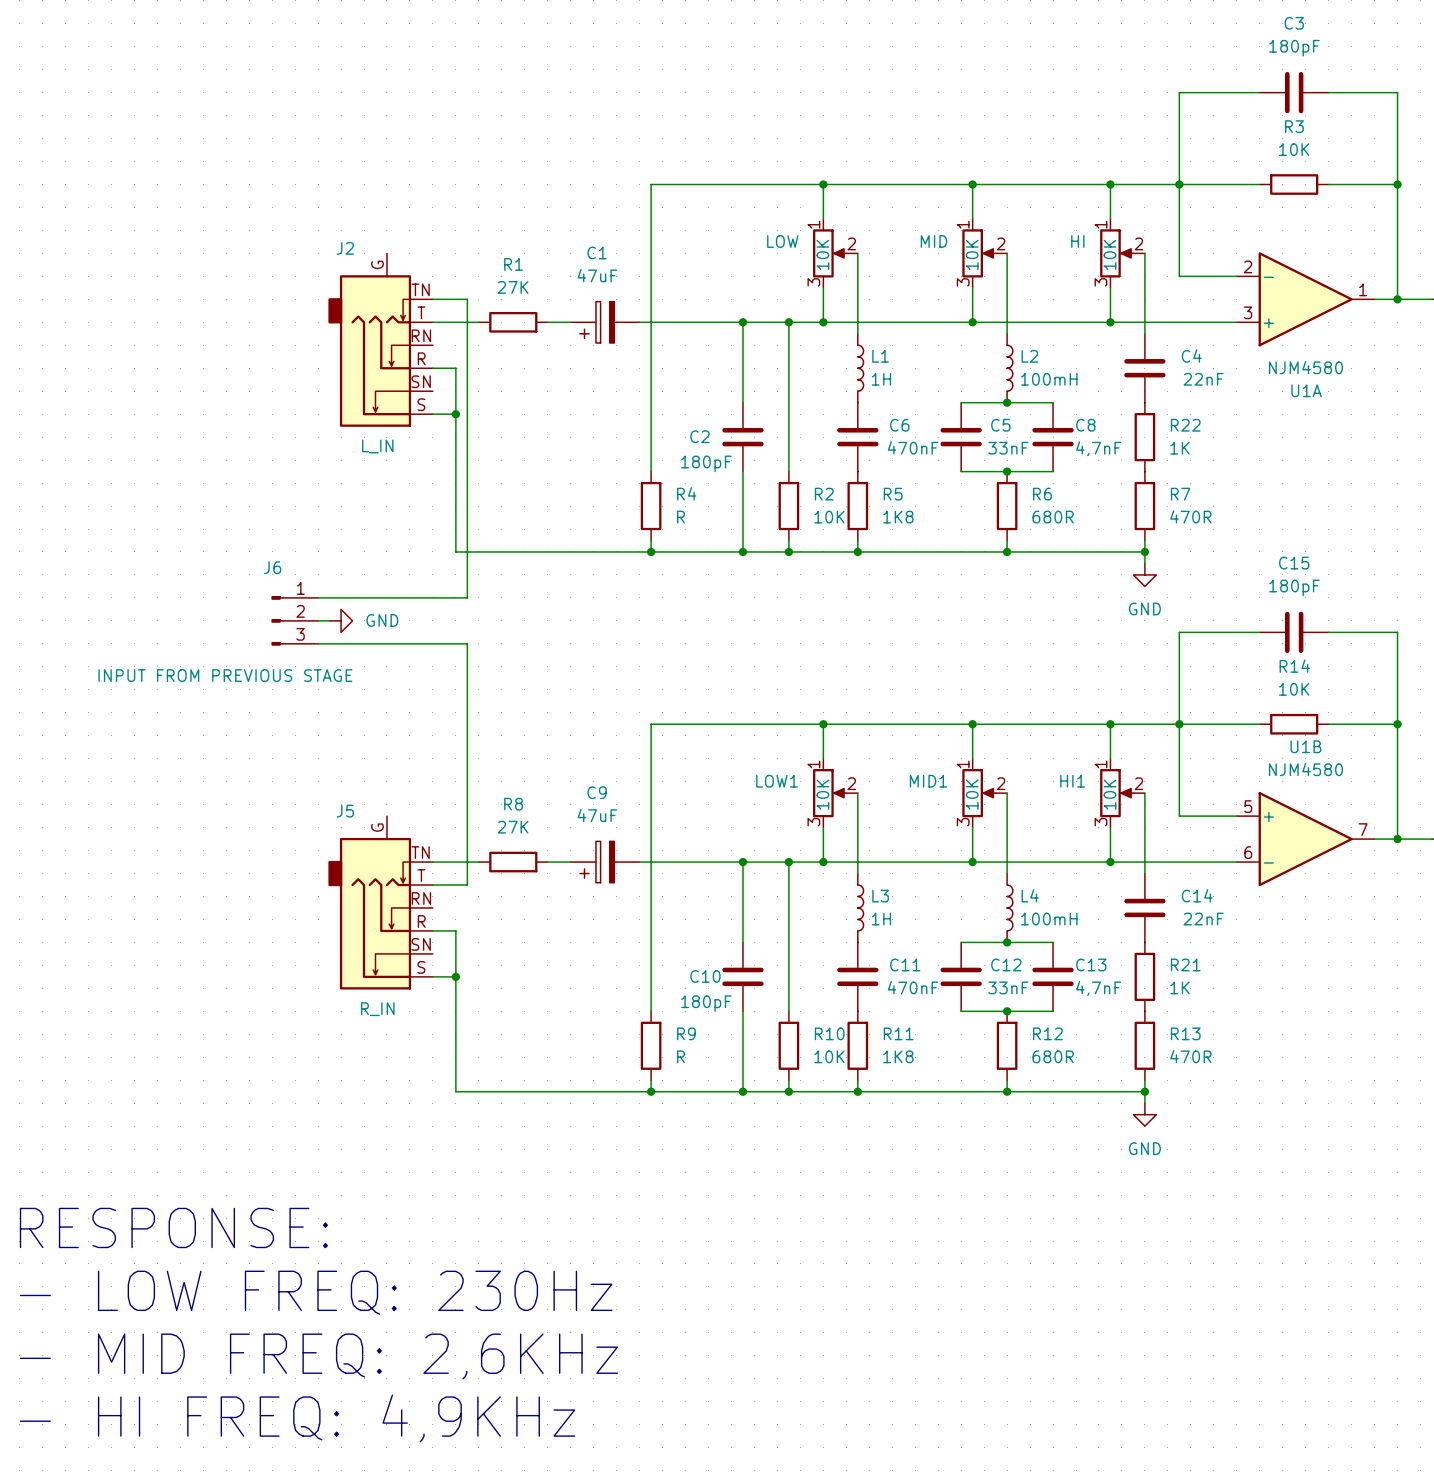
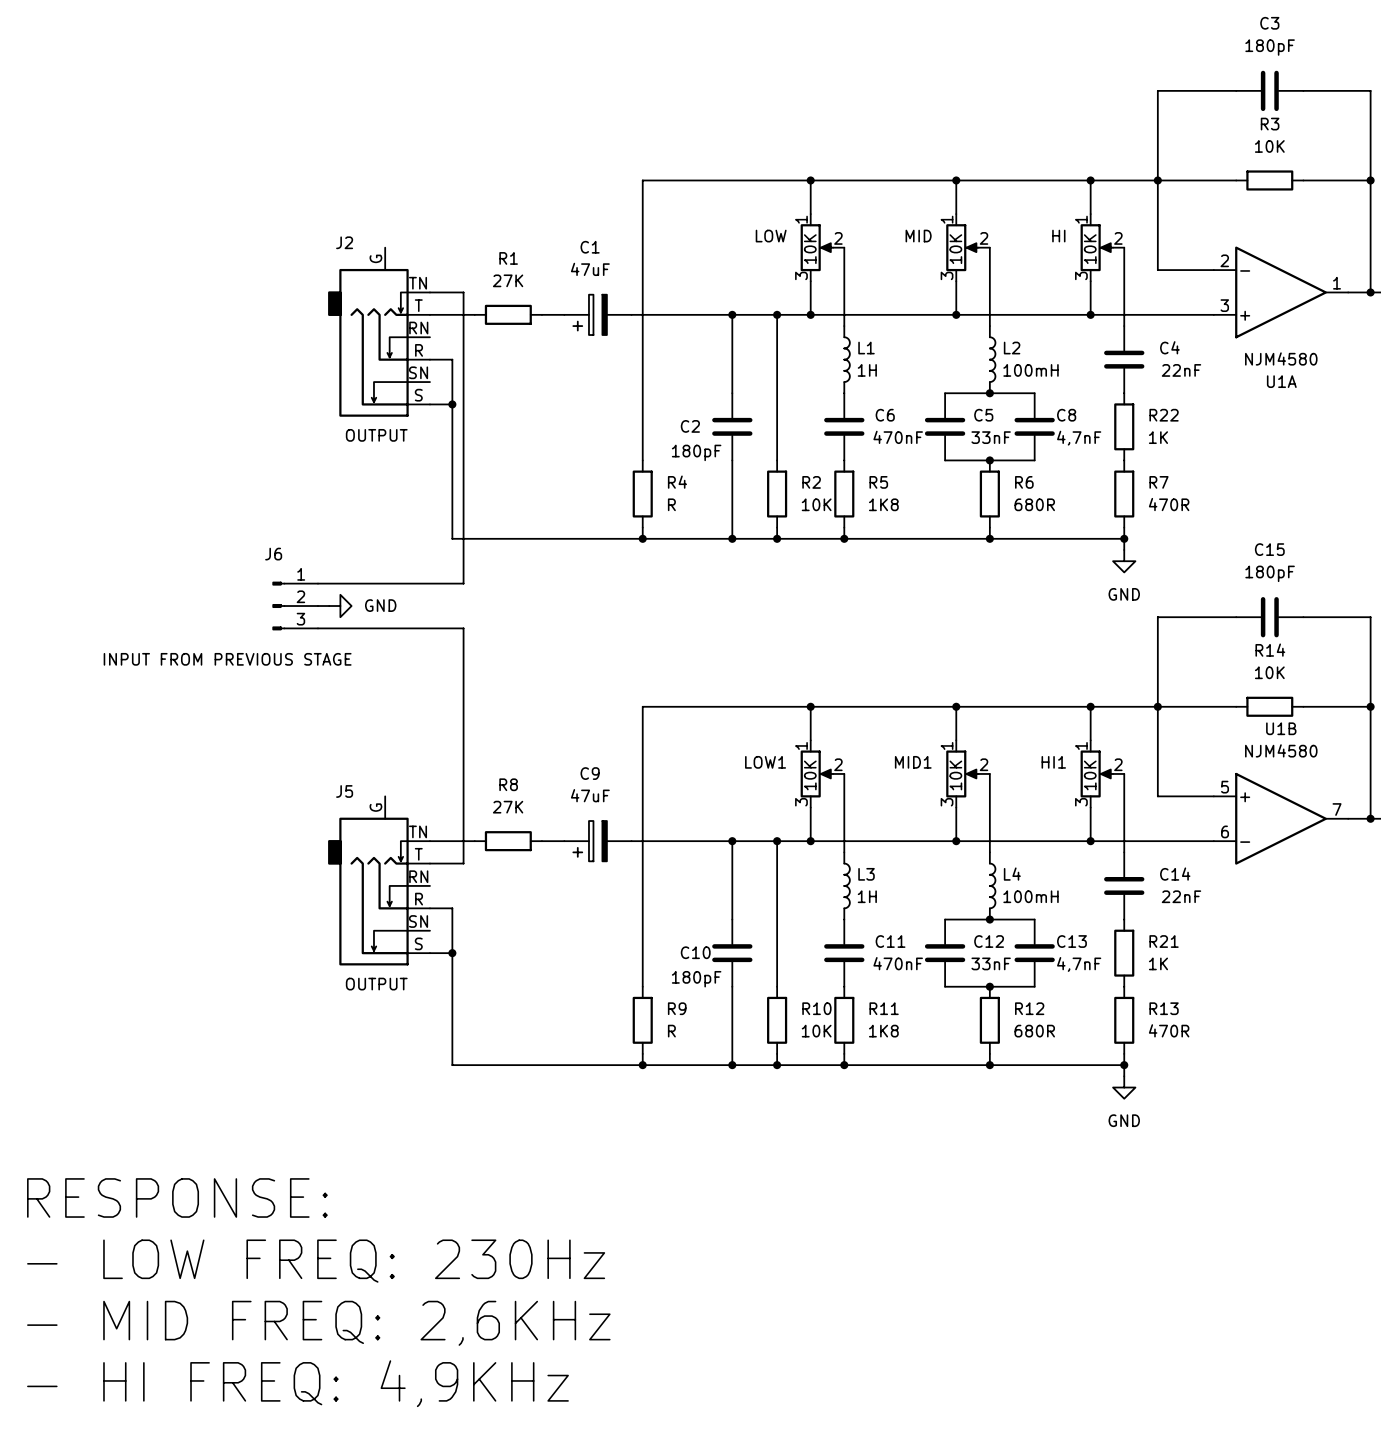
J2 value: L_IN (377, 446) -> OUTPUT (376, 435)
J5 value: R_IN (377, 1009) -> OUTPUT (376, 984)

